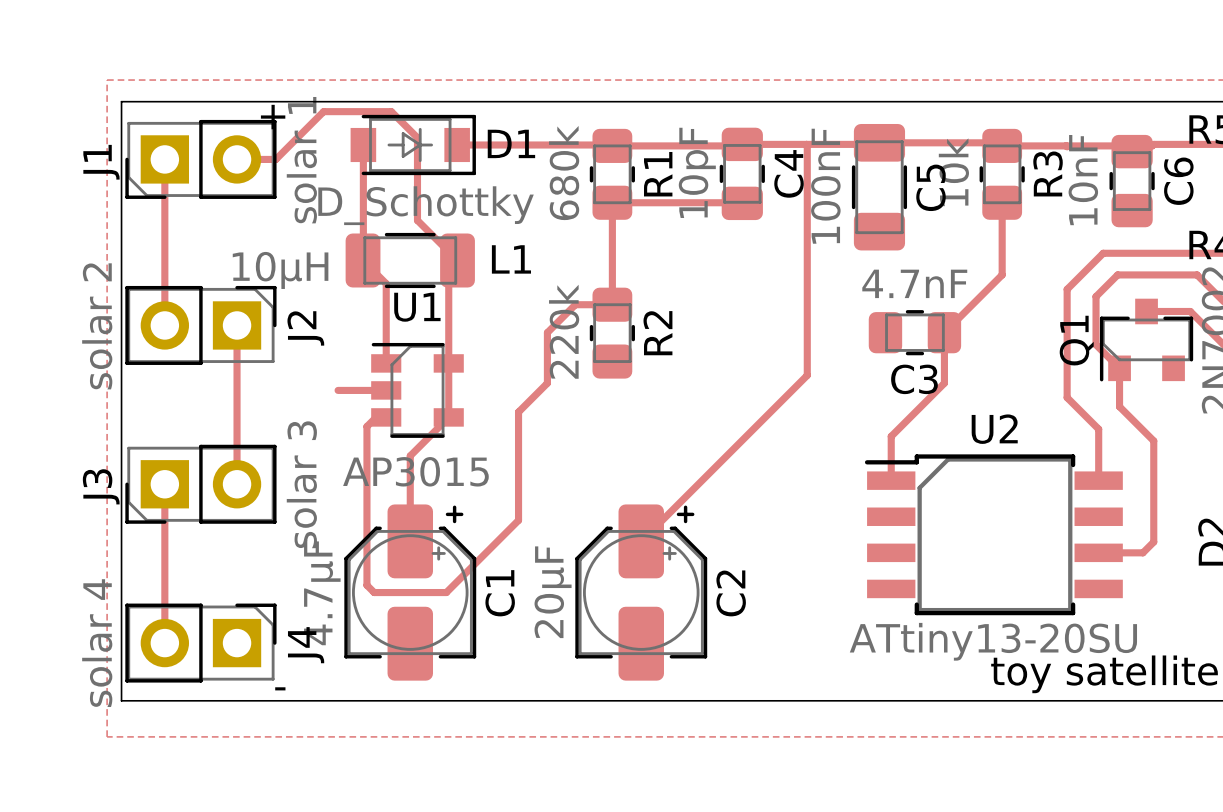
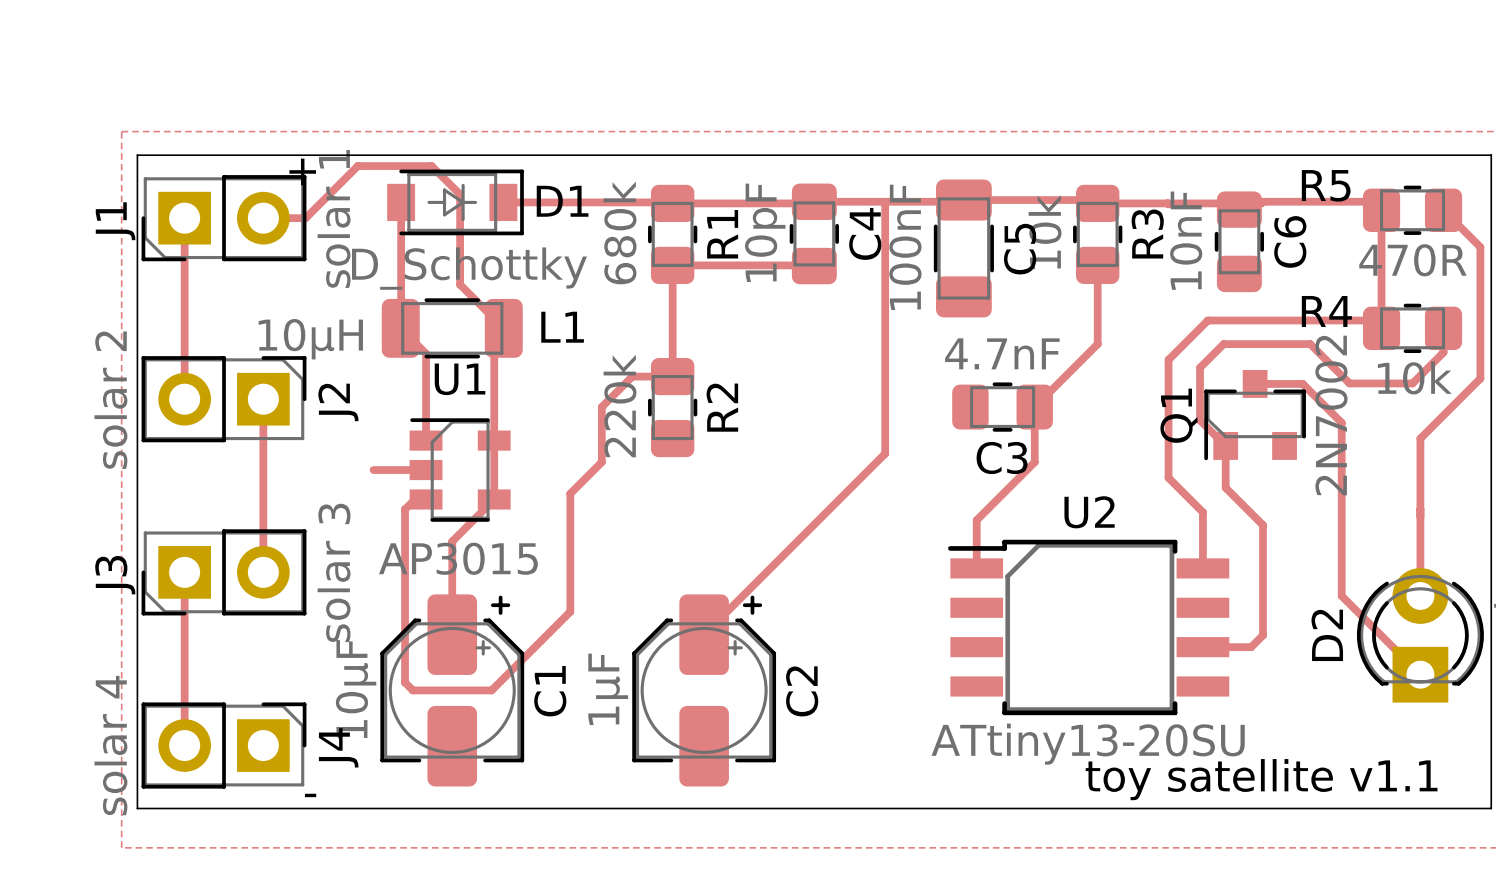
C1 value: 4.7µF (322, 592) -> 10µF (356, 689)
C2 value: 20µF (553, 592) -> 1µF (608, 689)

